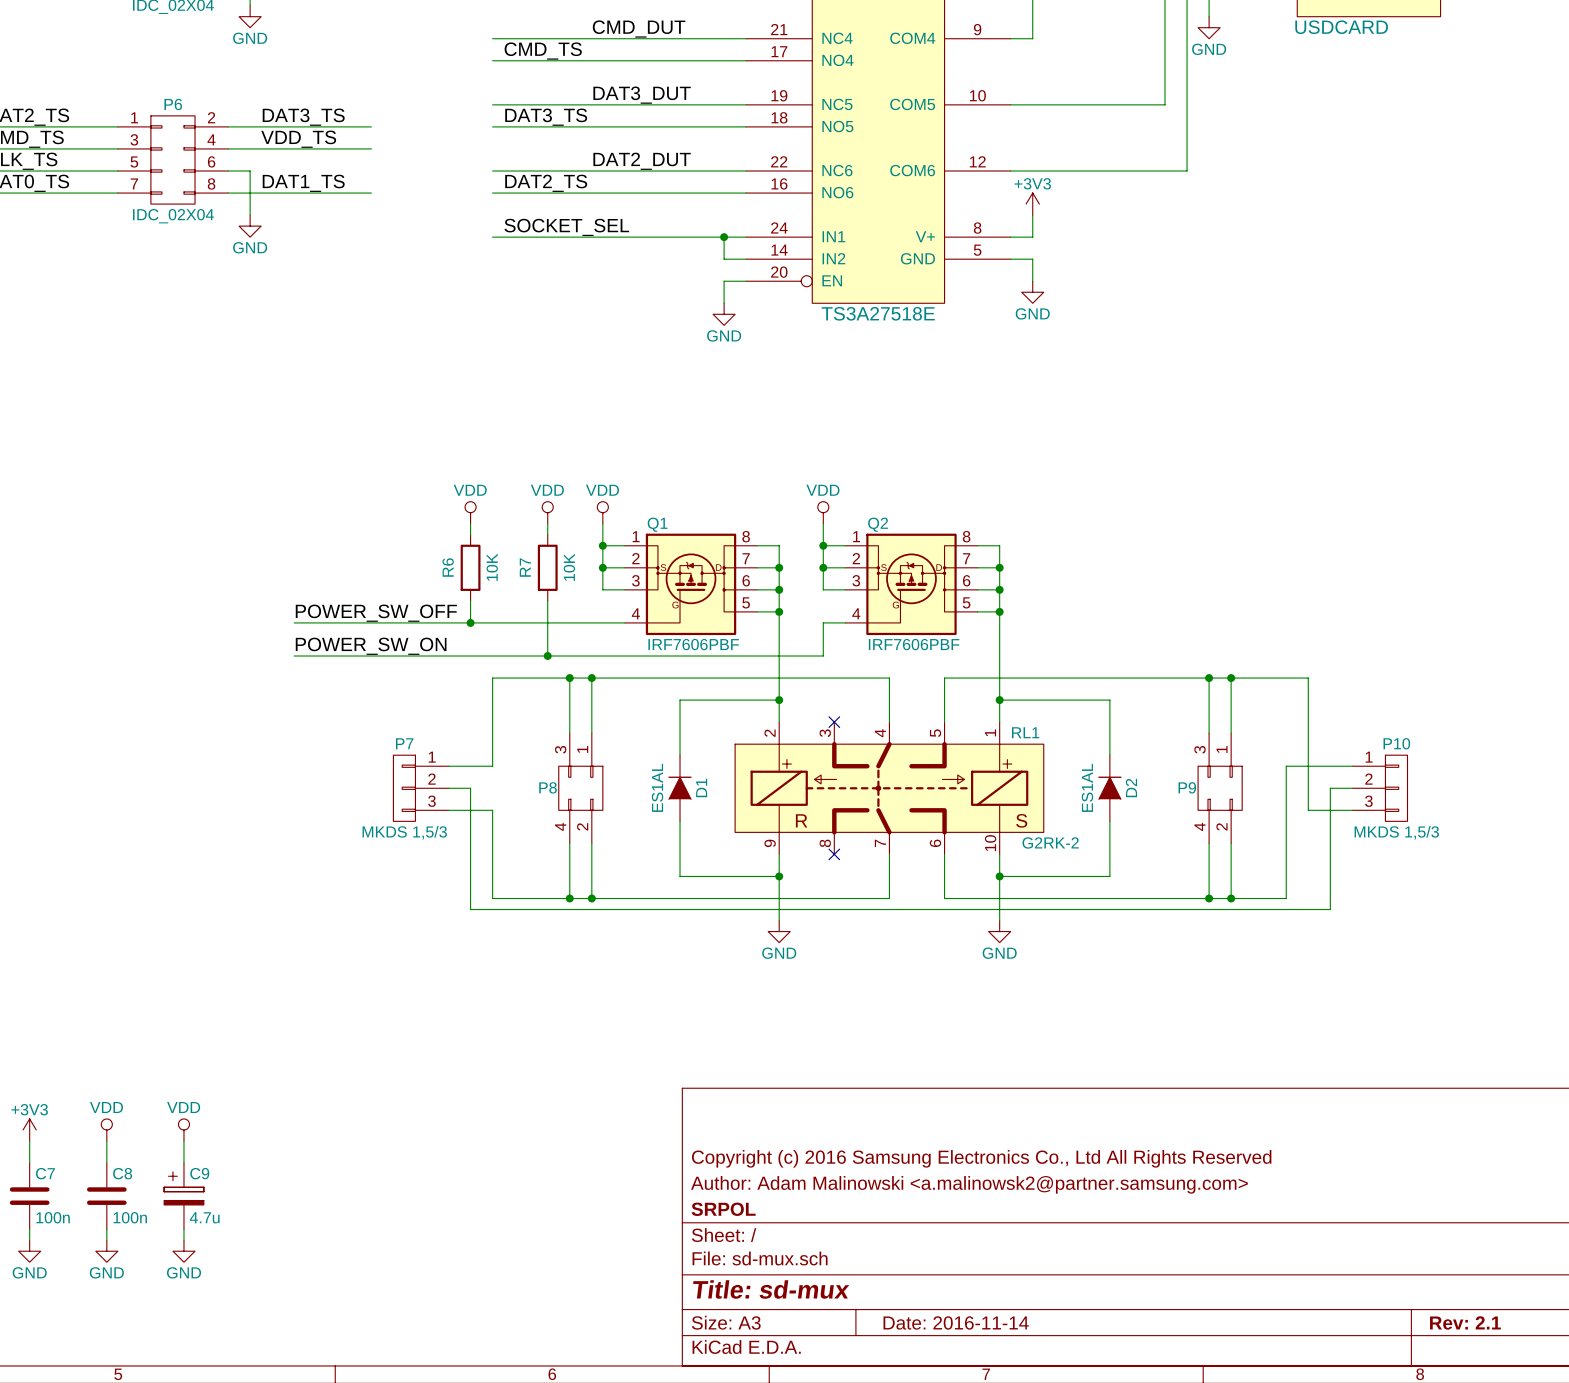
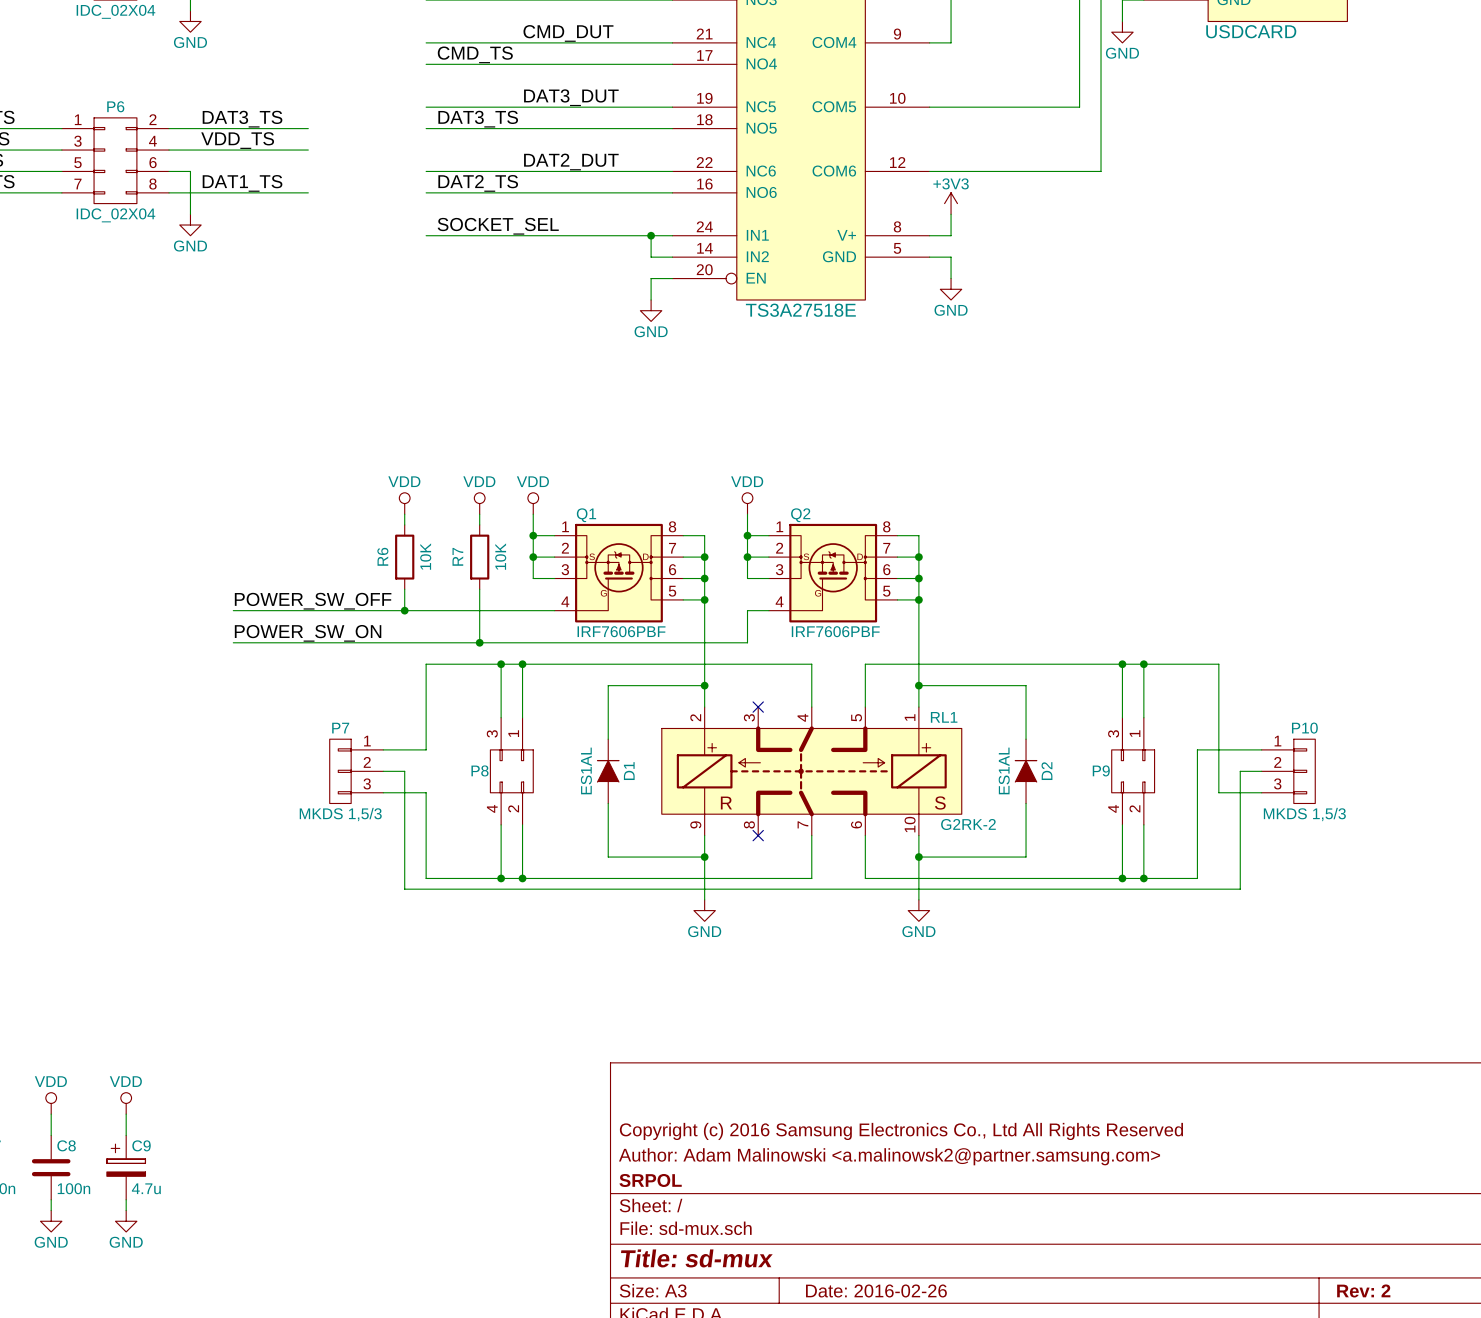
title block: Date: 2016-11-14 (956, 1322) -> Date: 2016-02-26 (876, 1290)
title block: Rev: 2.1 (1465, 1322) -> Rev: 2 (1363, 1290)

